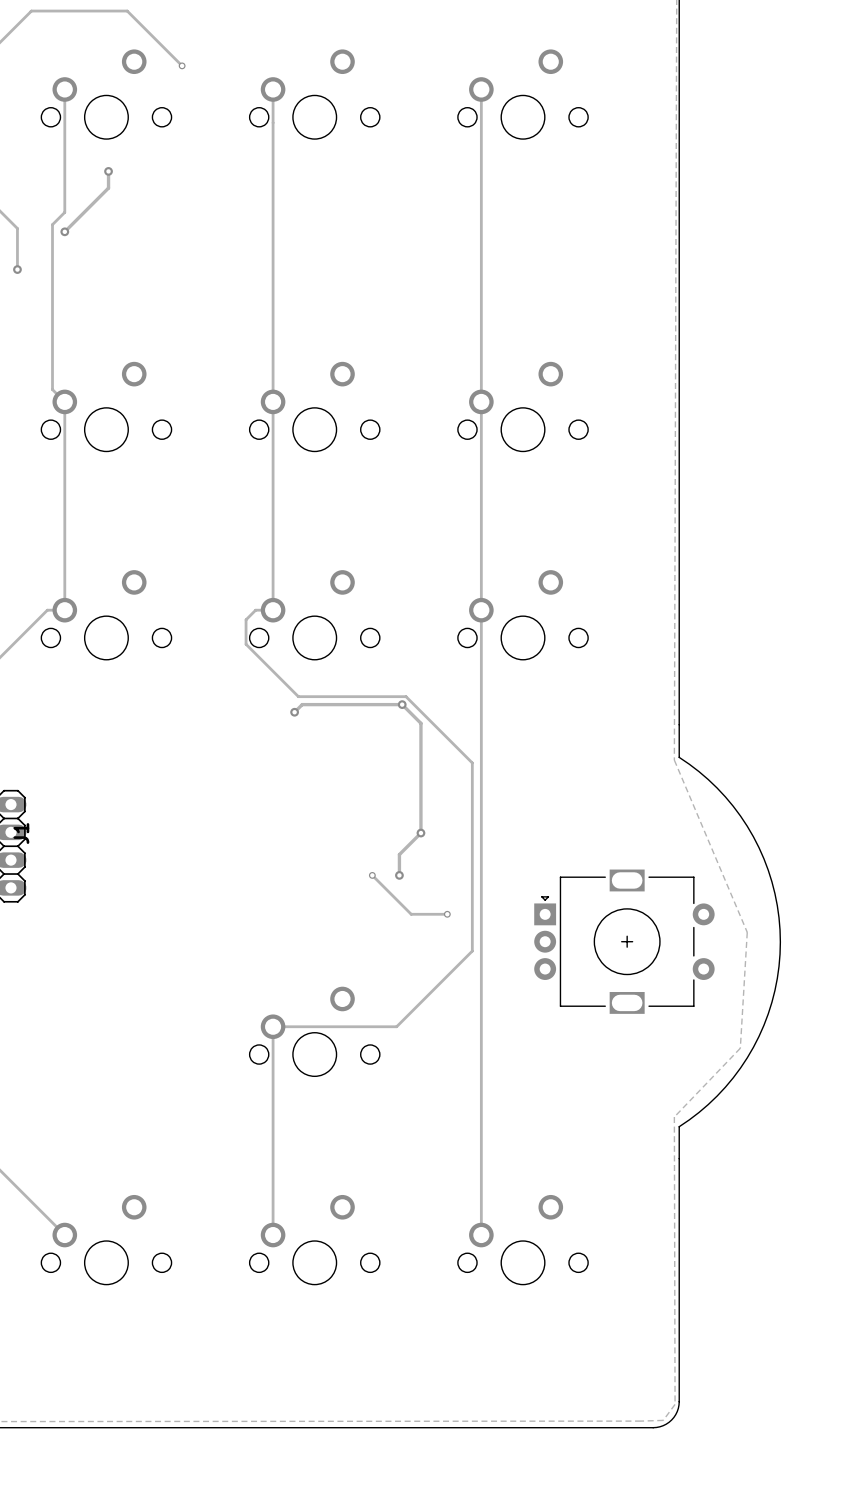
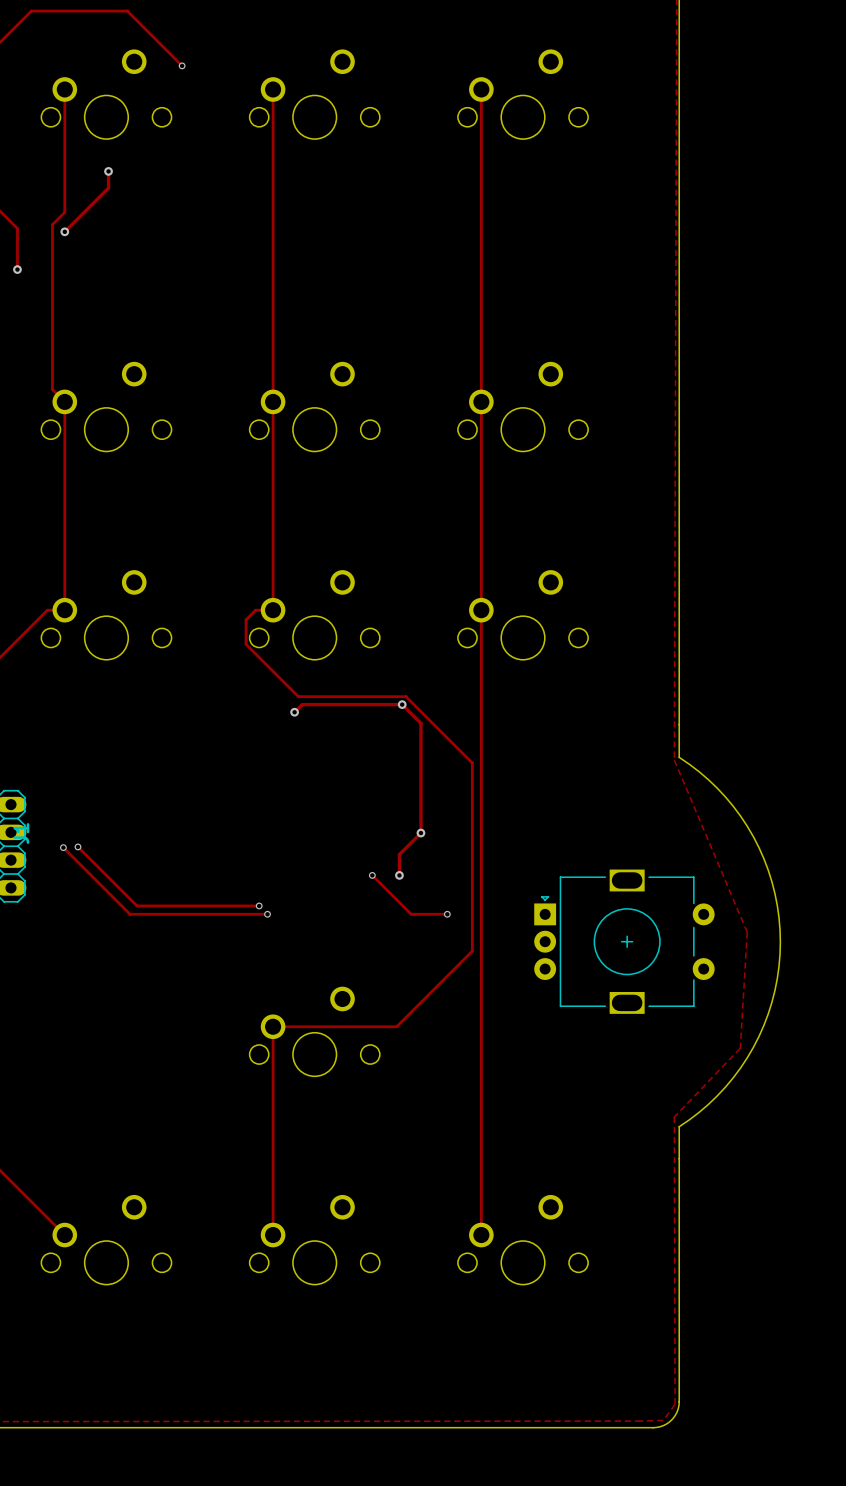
track: none -> (77, 846) (137, 905) (259, 905)
via: none -> (77, 846)
track: none -> (63, 847) (130, 914) (267, 914)
via: none -> (63, 847)
via: none -> (259, 905)
via: none -> (267, 914)

